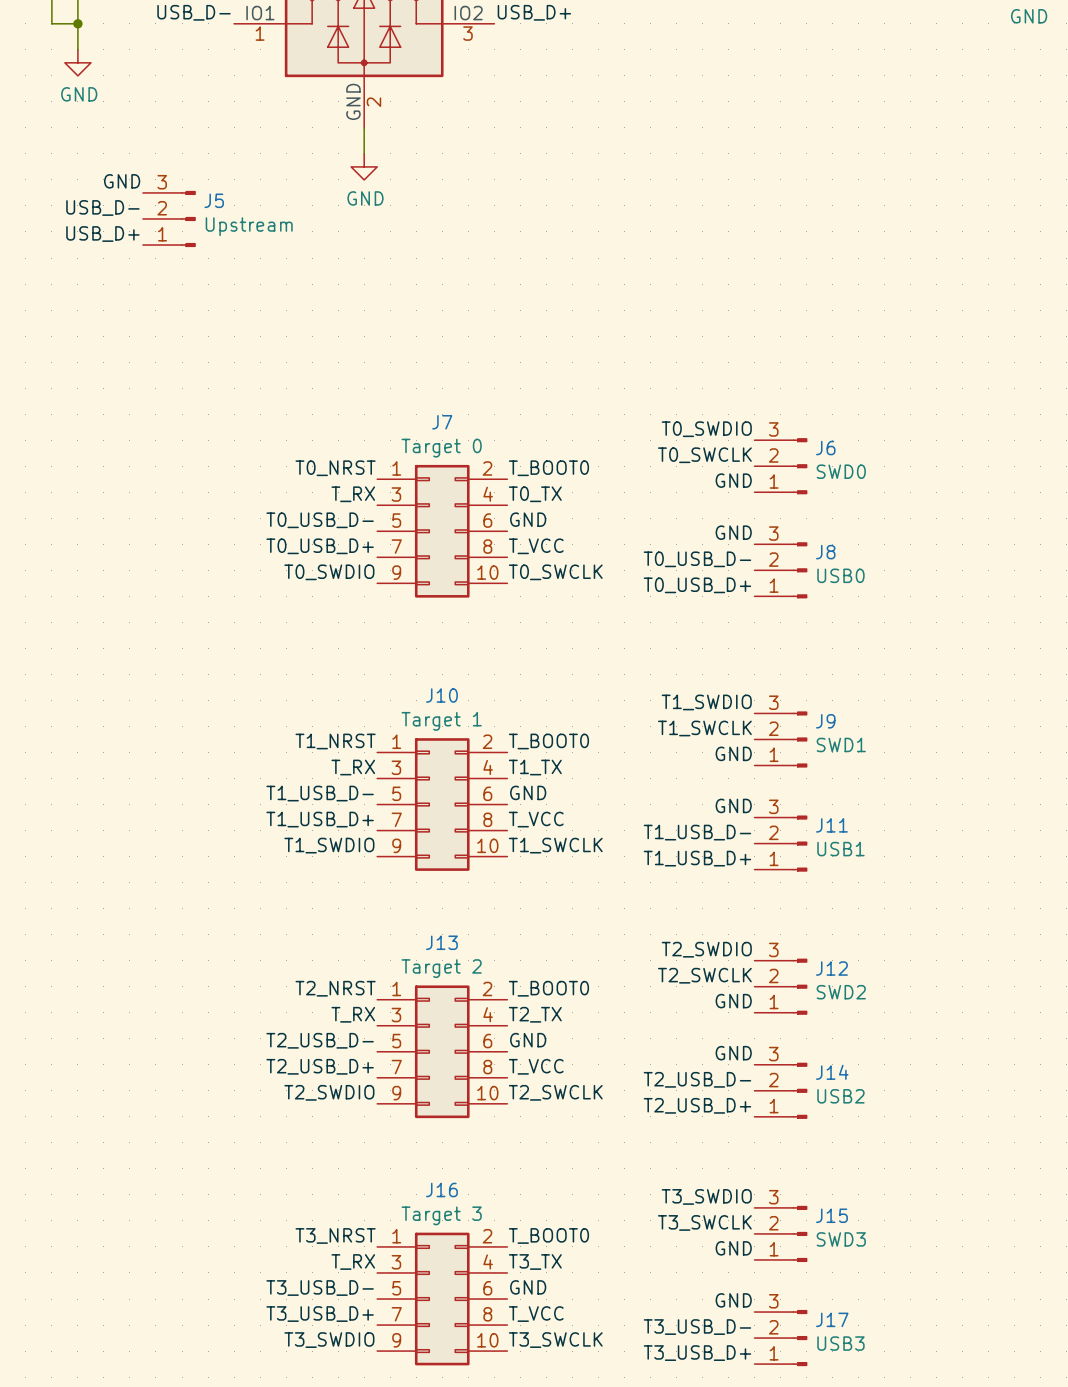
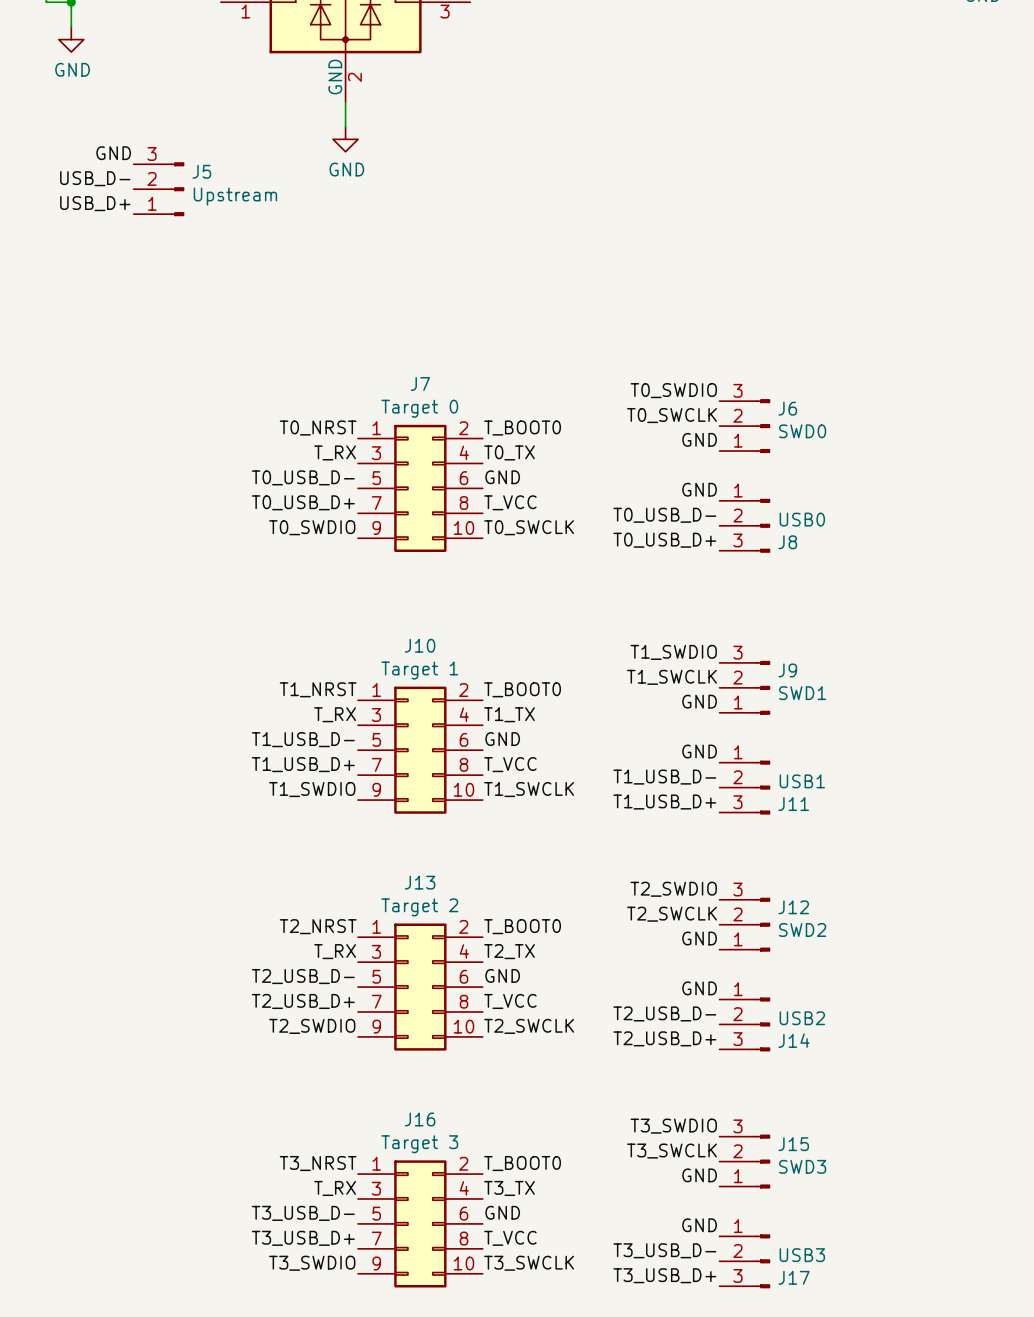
J8 flip: as is (800, 570) -> up-down (763, 525)
J11 flip: as is (800, 843) -> up-down (763, 787)
J14 flip: as is (800, 1090) -> up-down (763, 1024)
J17 flip: as is (800, 1338) -> up-down (763, 1261)

